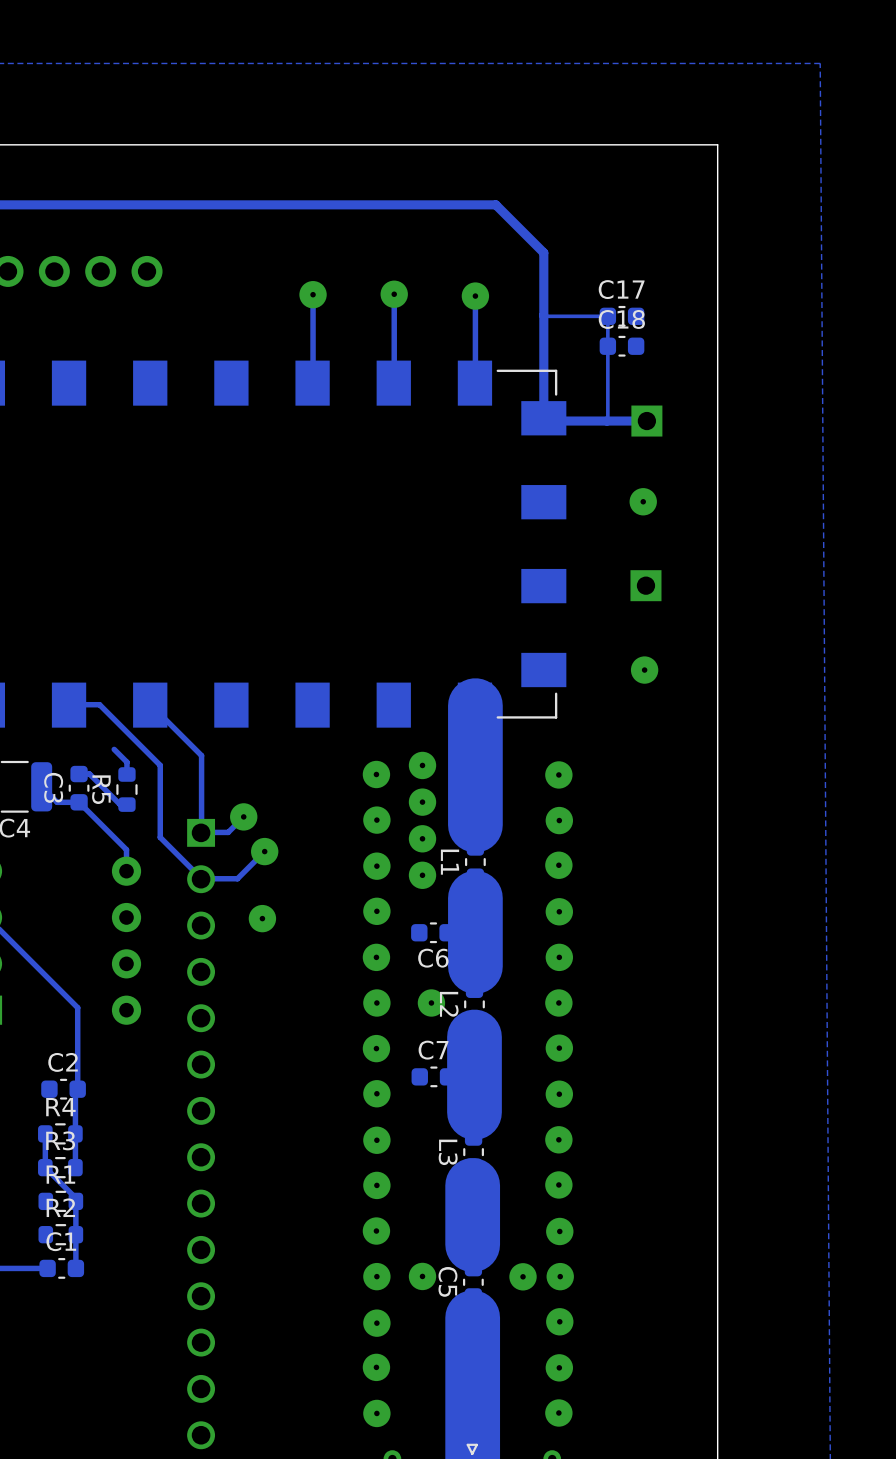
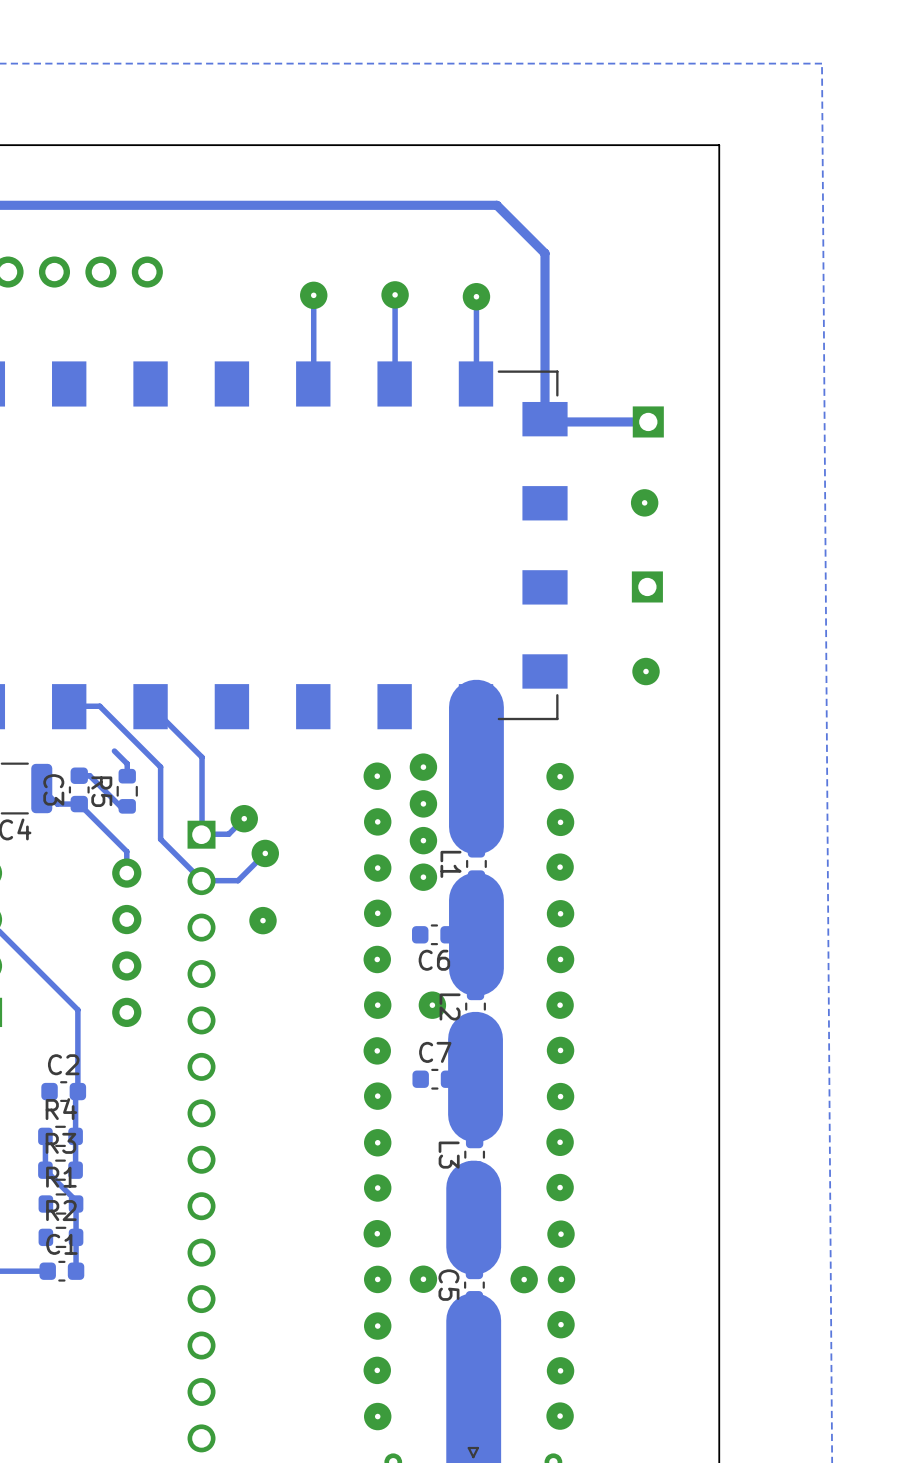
track: (543, 315) (607, 316) (606, 421) -> none
C17: (621, 316) -> none
C18: (621, 346) -> none

